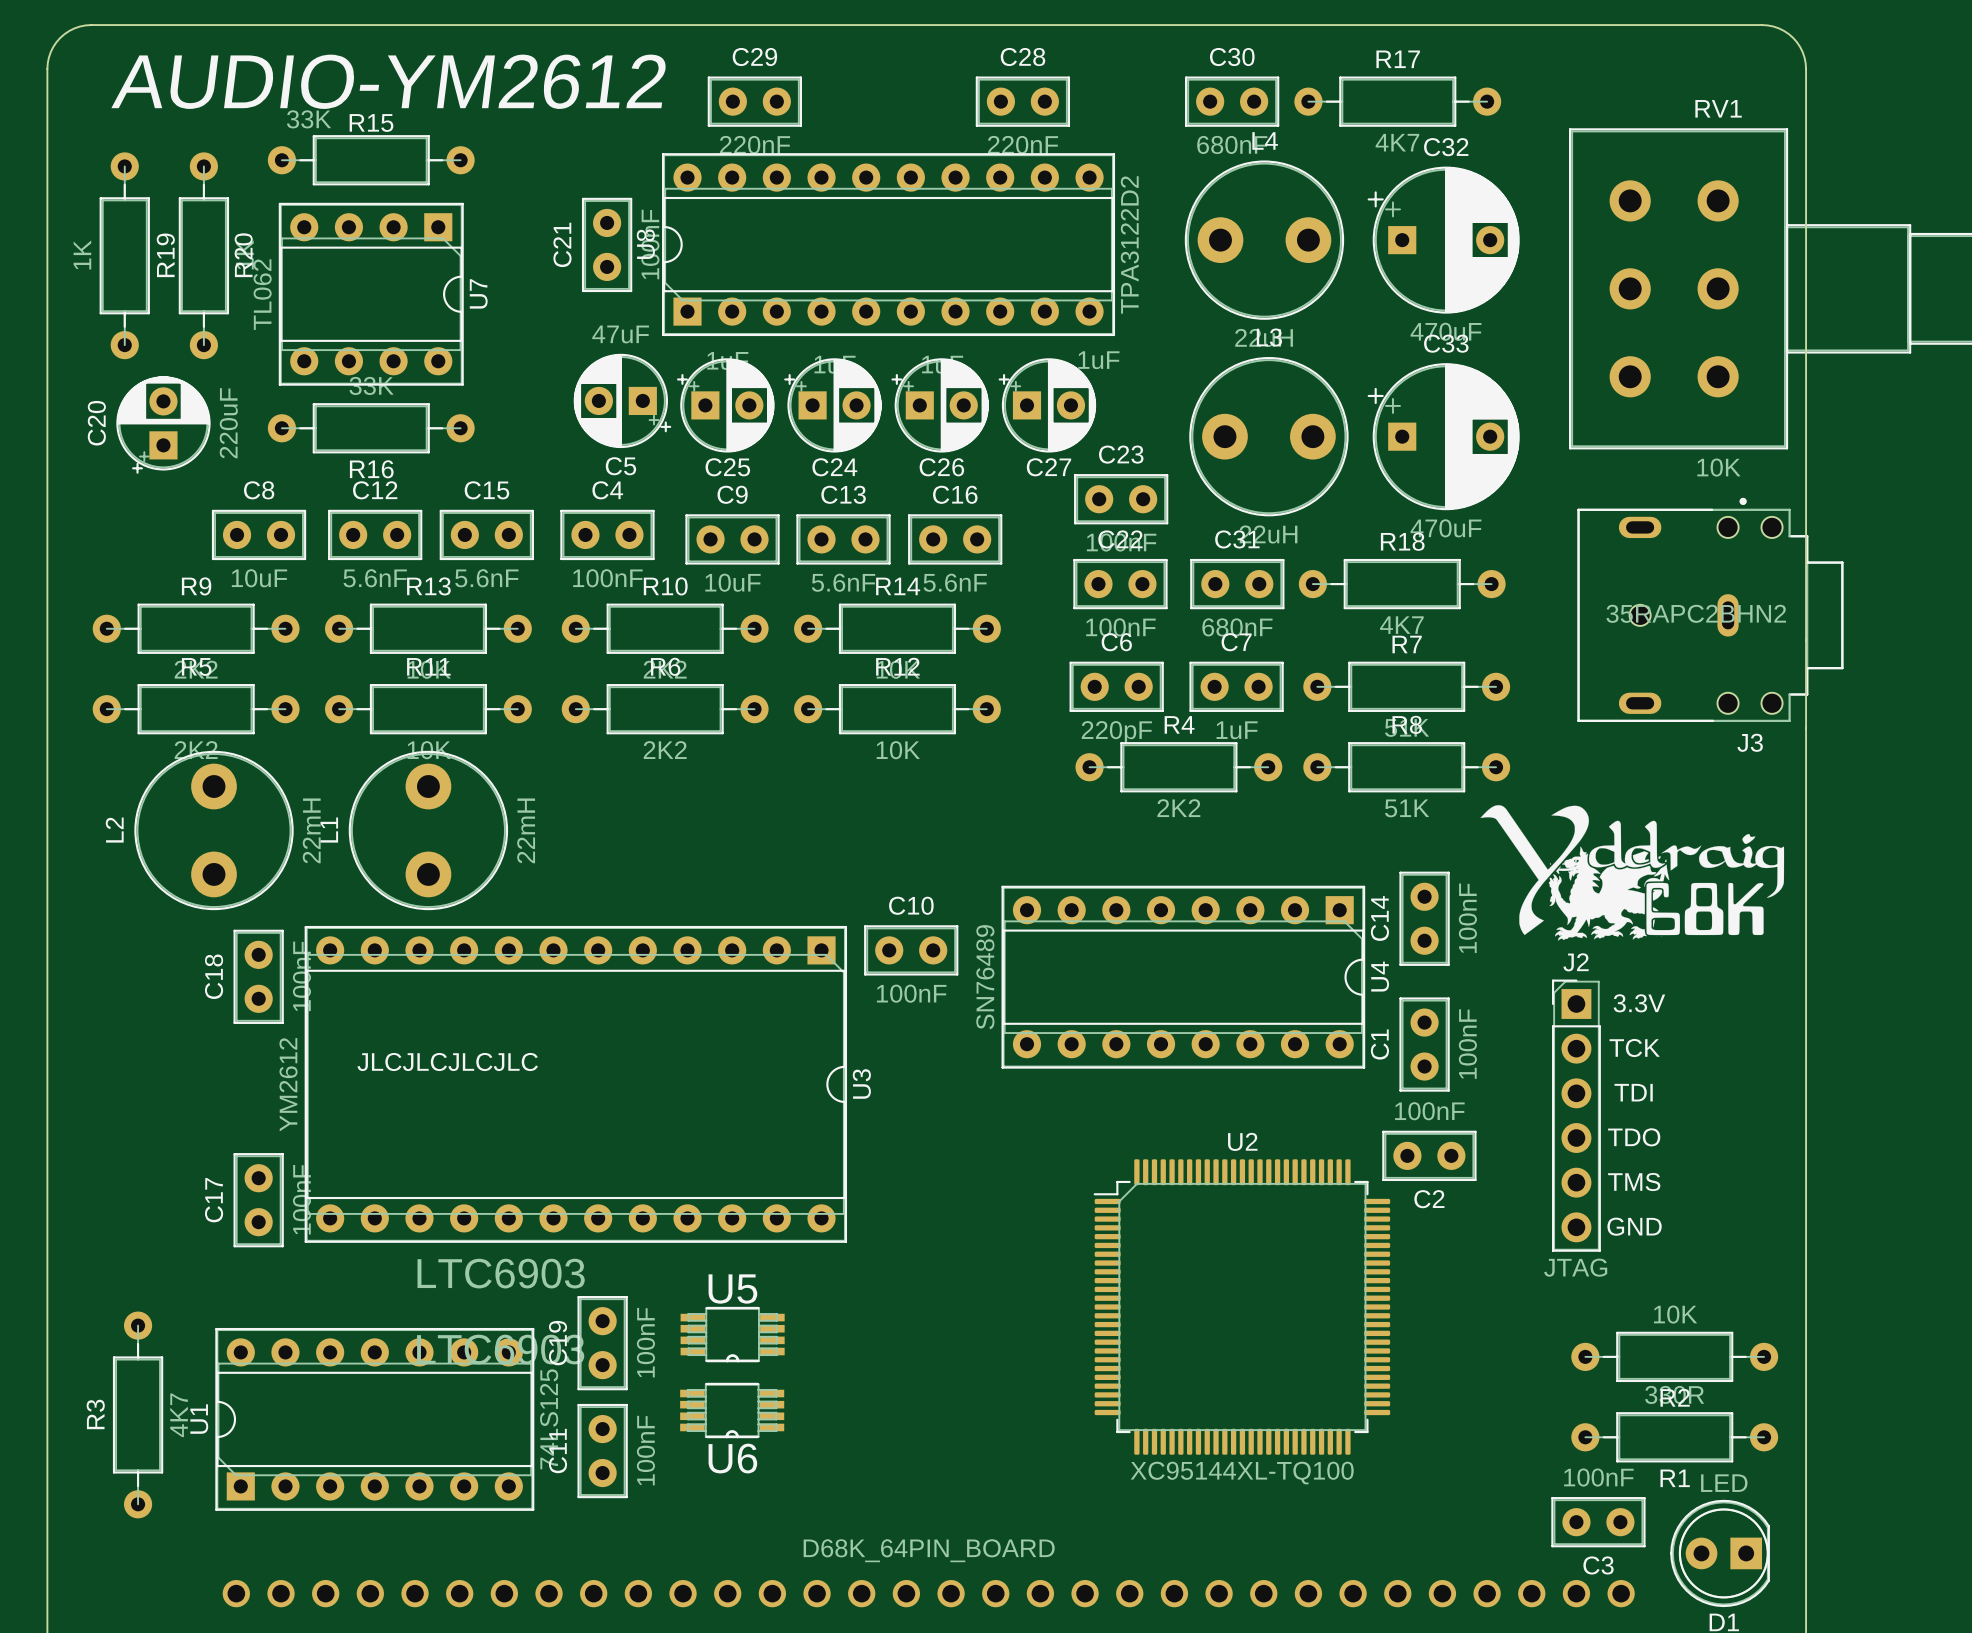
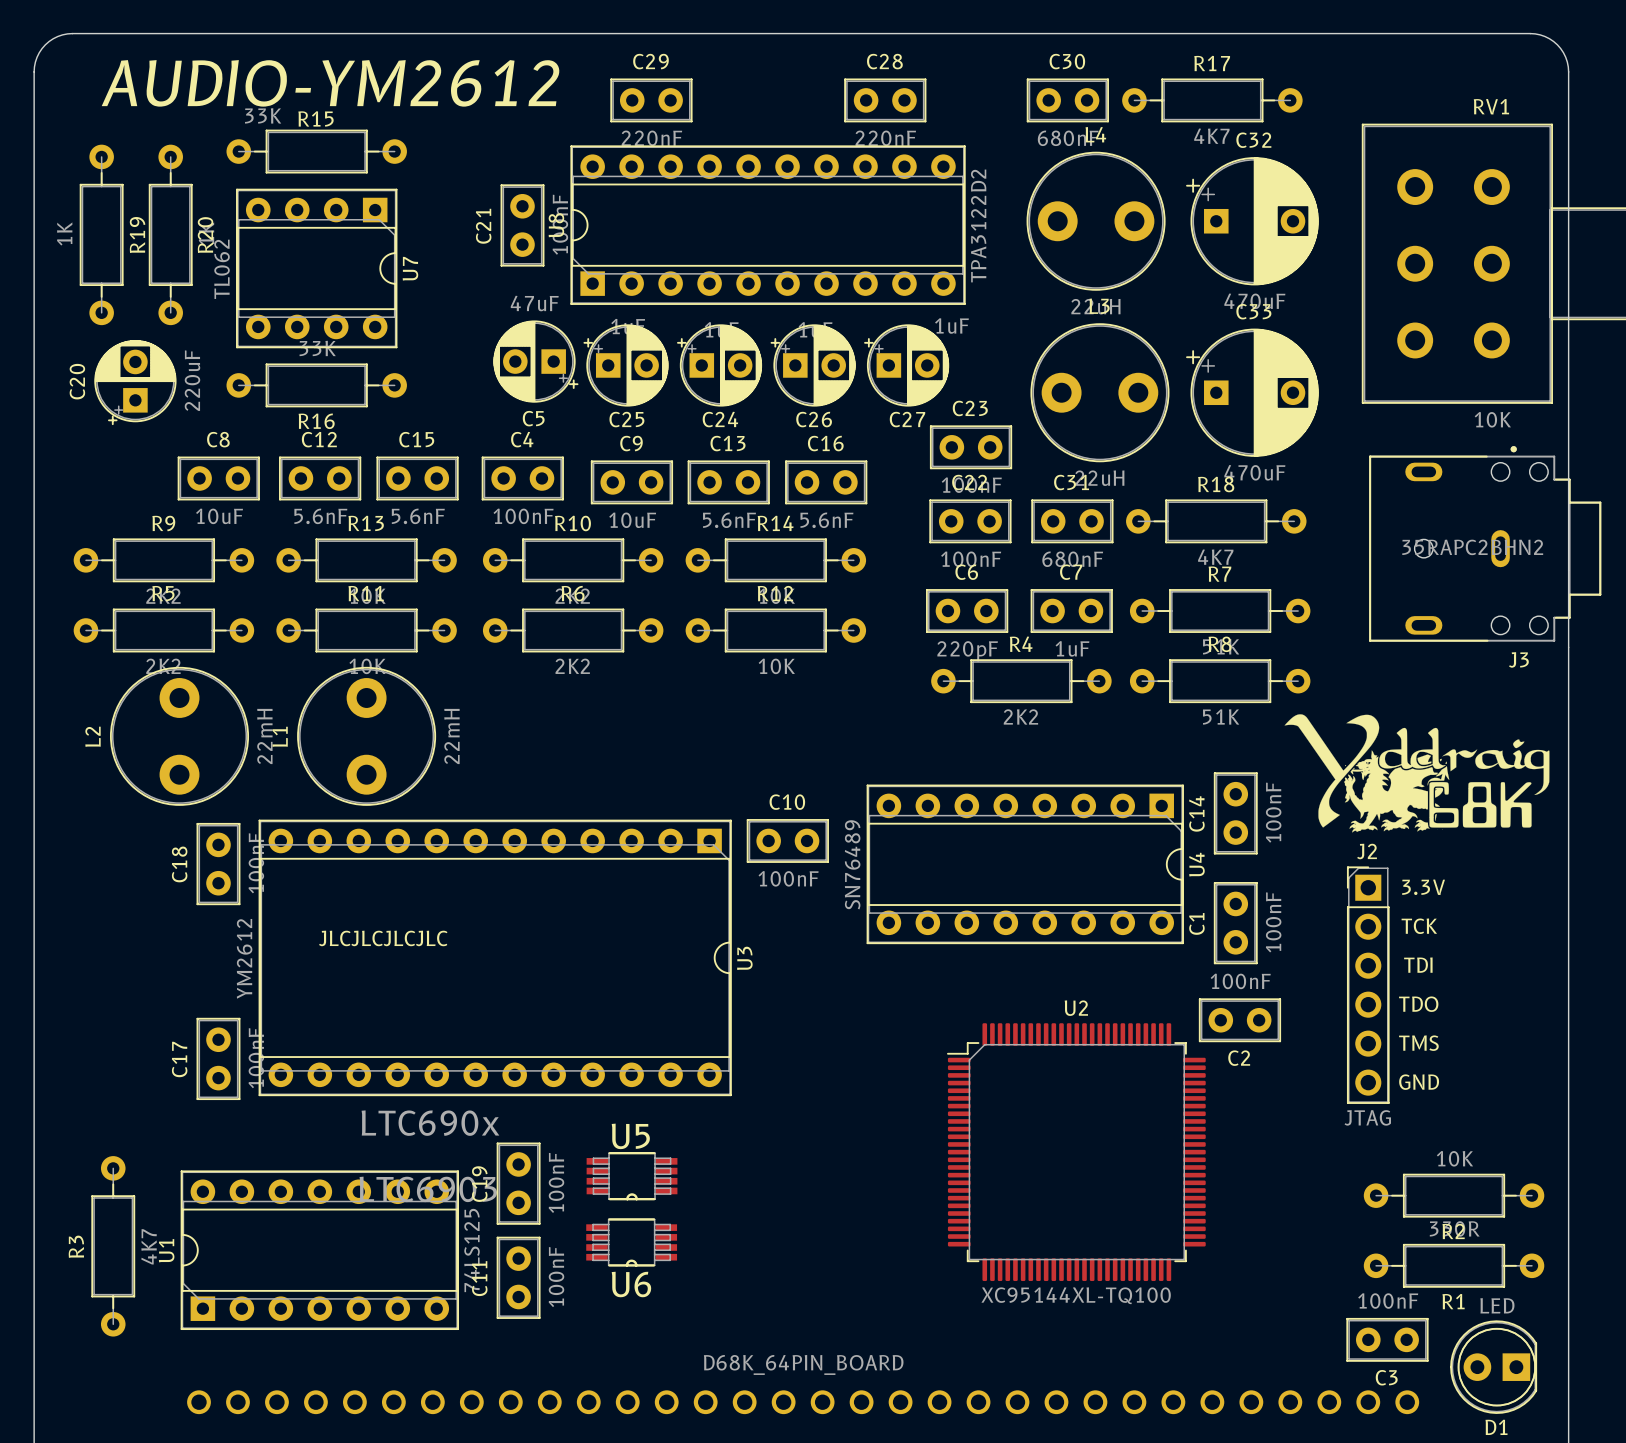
U5 value: LTC6903 (501, 1273) -> LTC690x (430, 1123)

